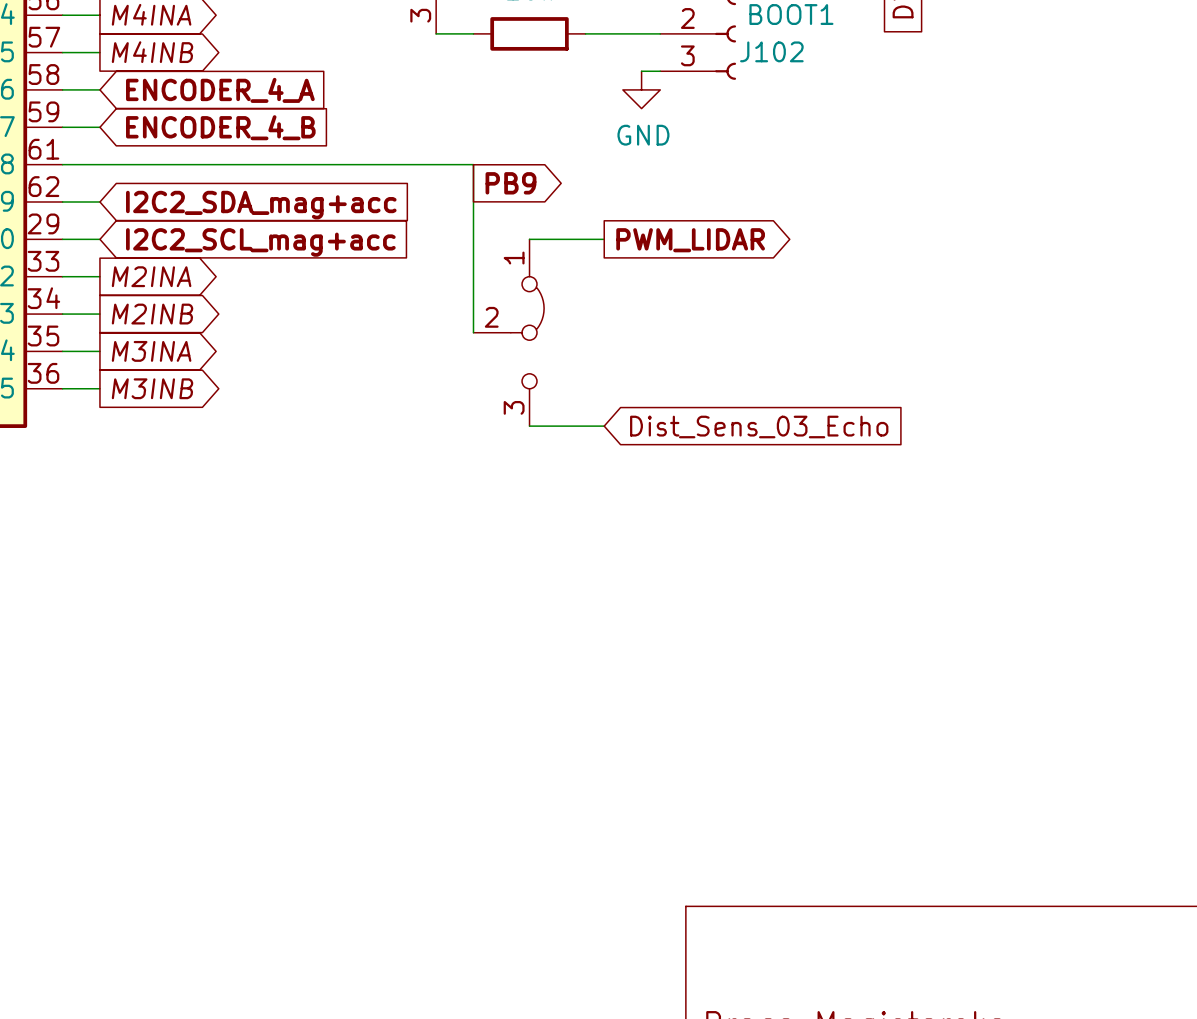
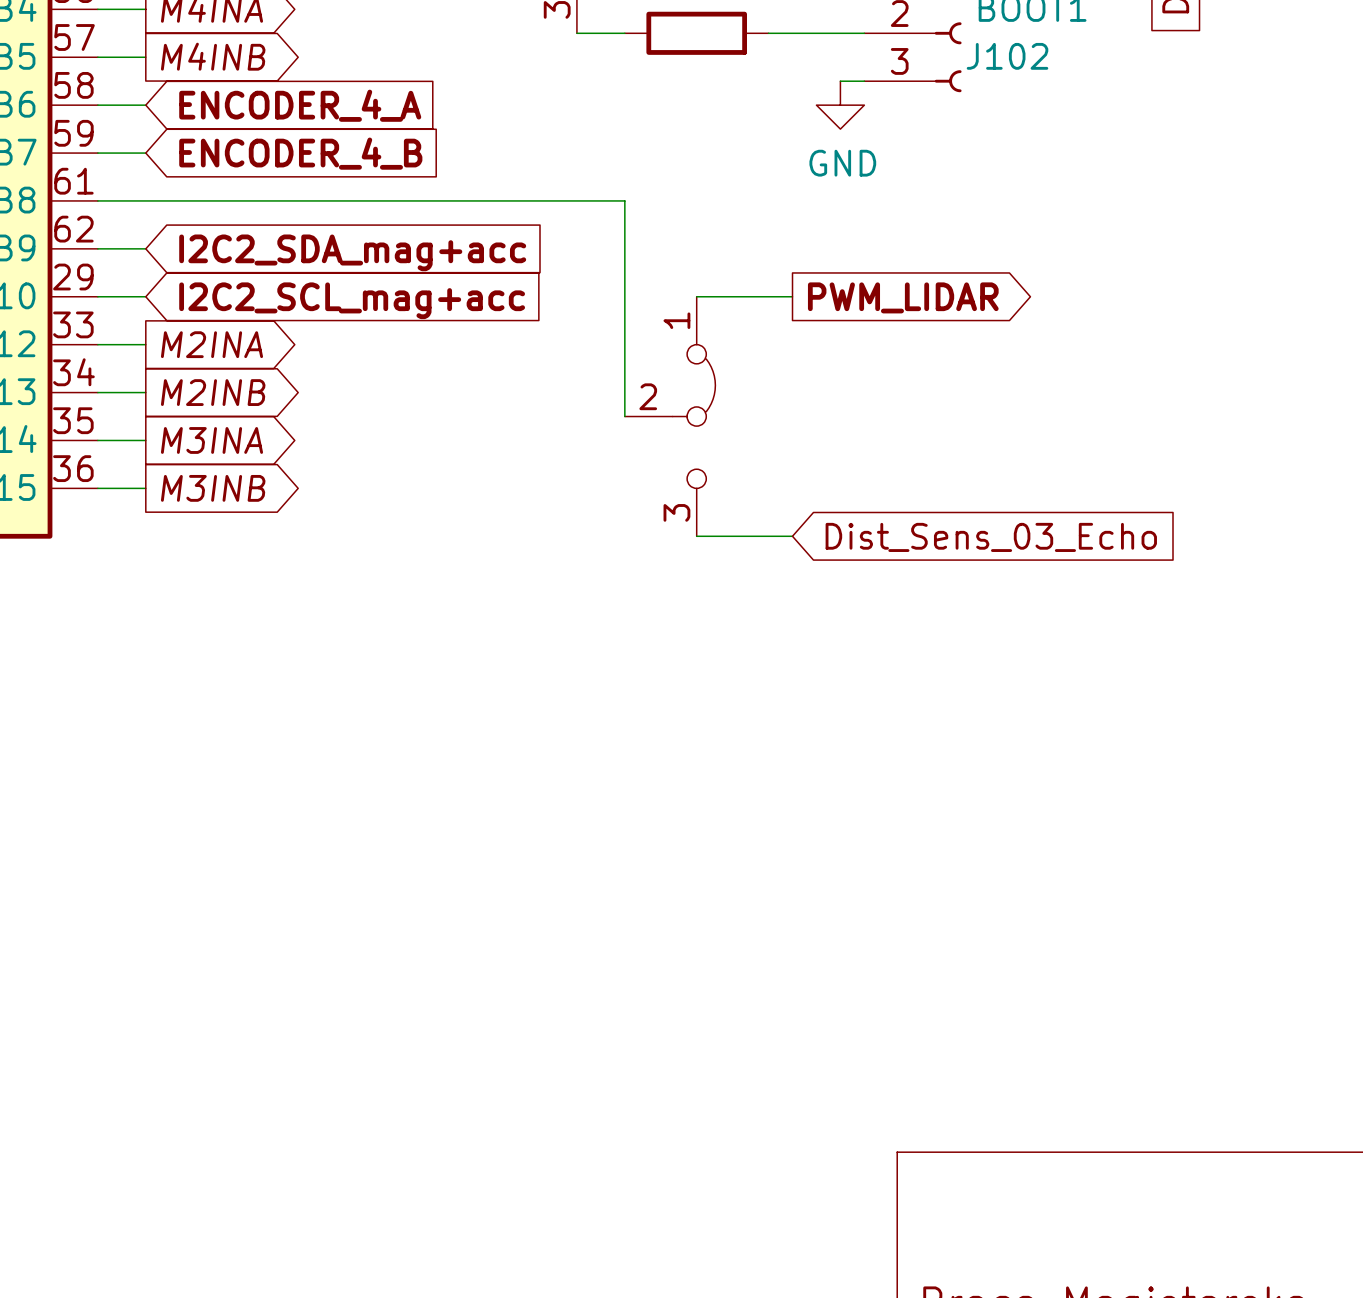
global label: PB9 (510, 183) -> none

